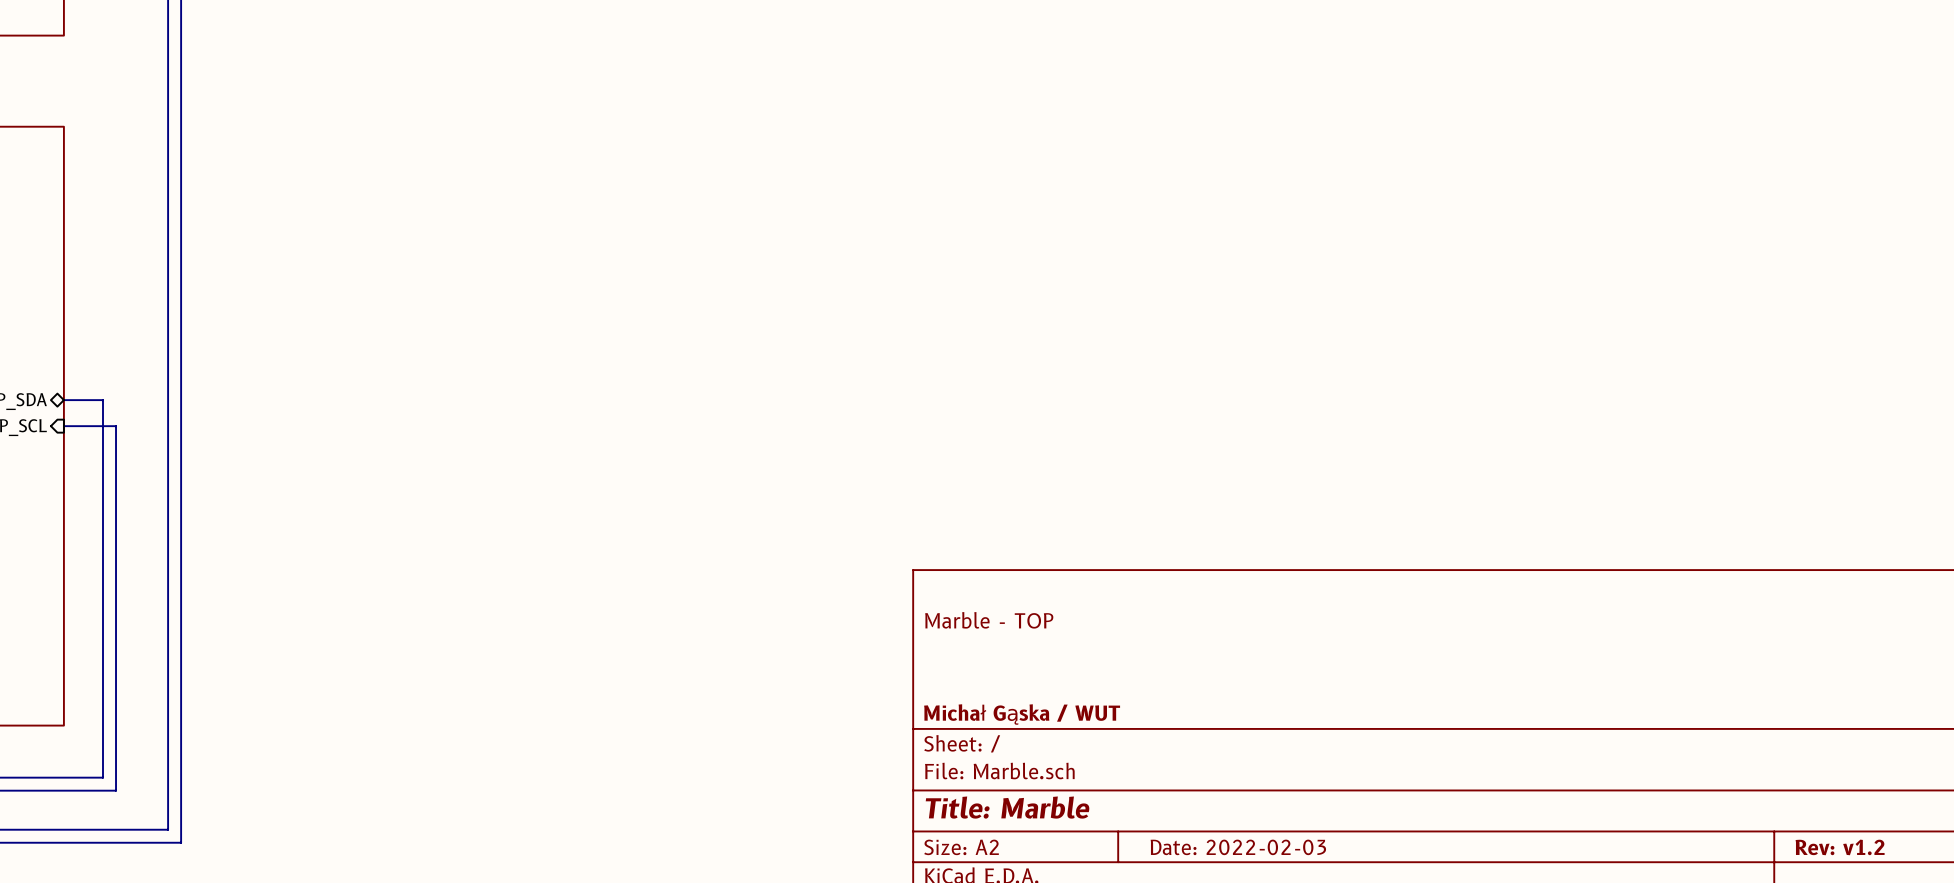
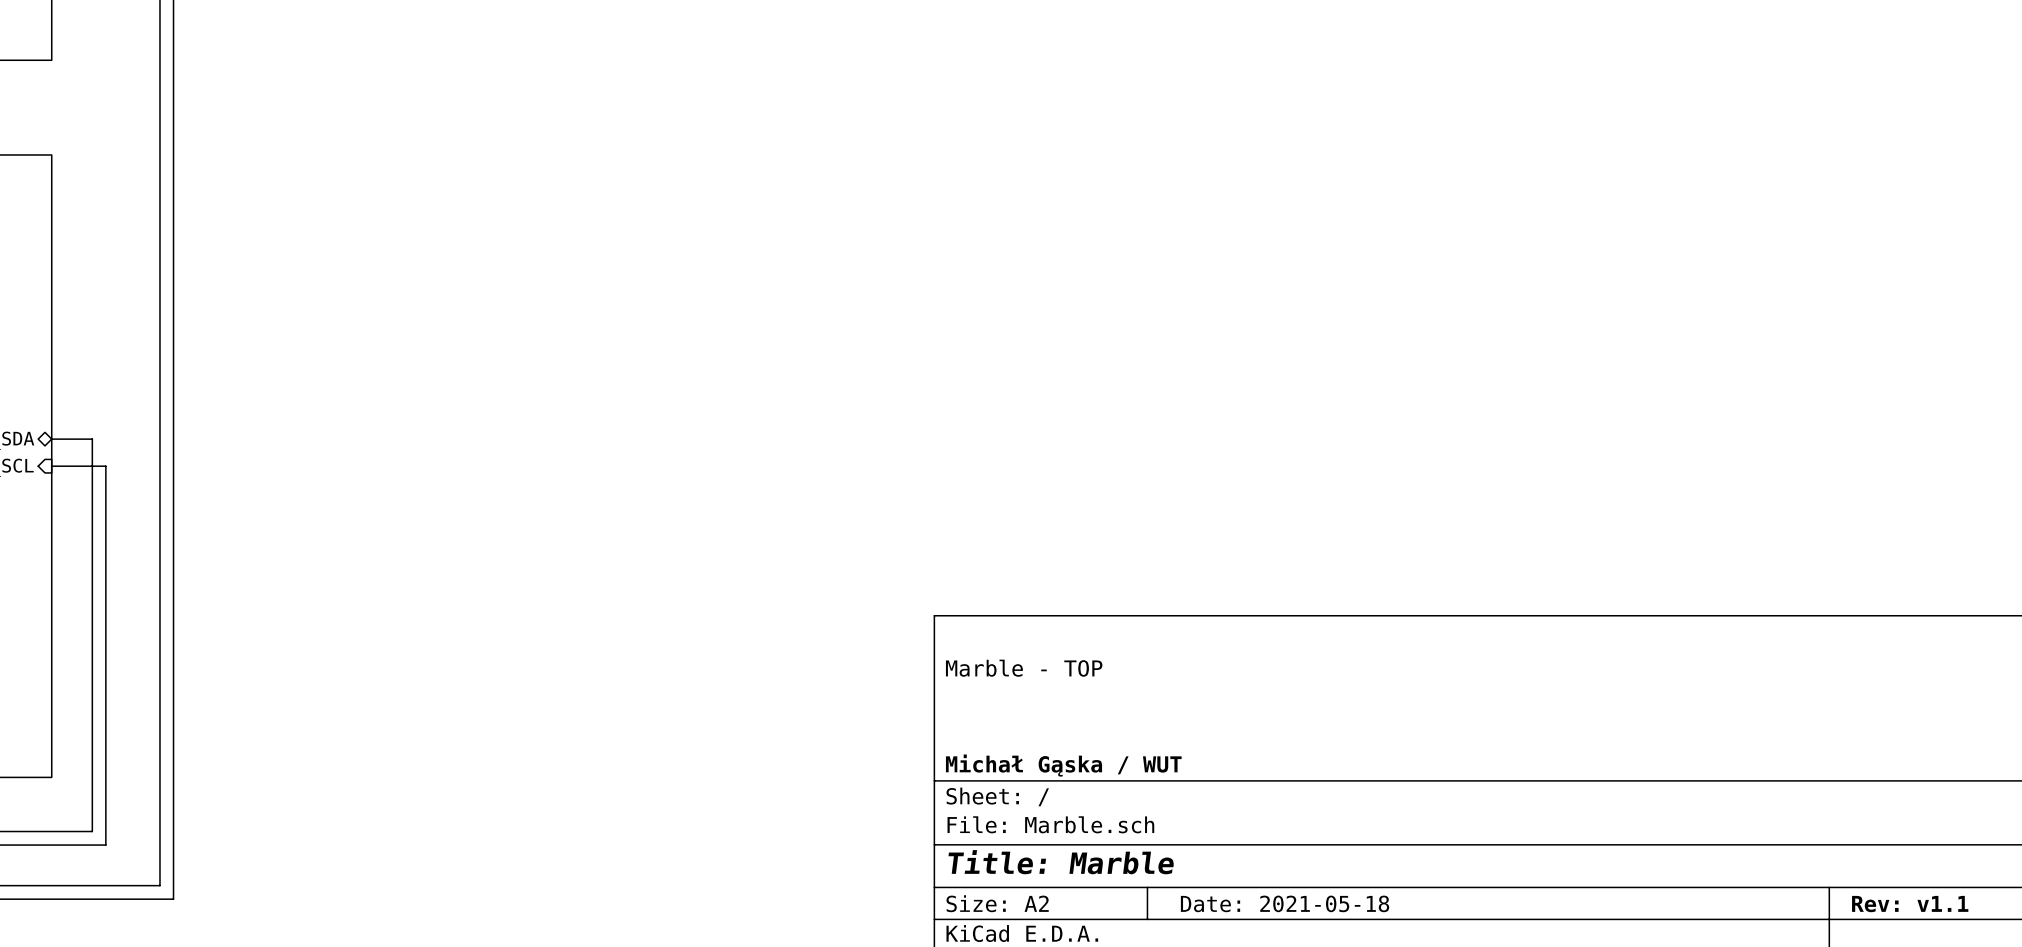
title block: Date: 2022-02-03 (1238, 847) -> Date: 2021-05-18 (1285, 903)
title block: Rev: v1.2 (1840, 847) -> Rev: v1.1 (1910, 904)

